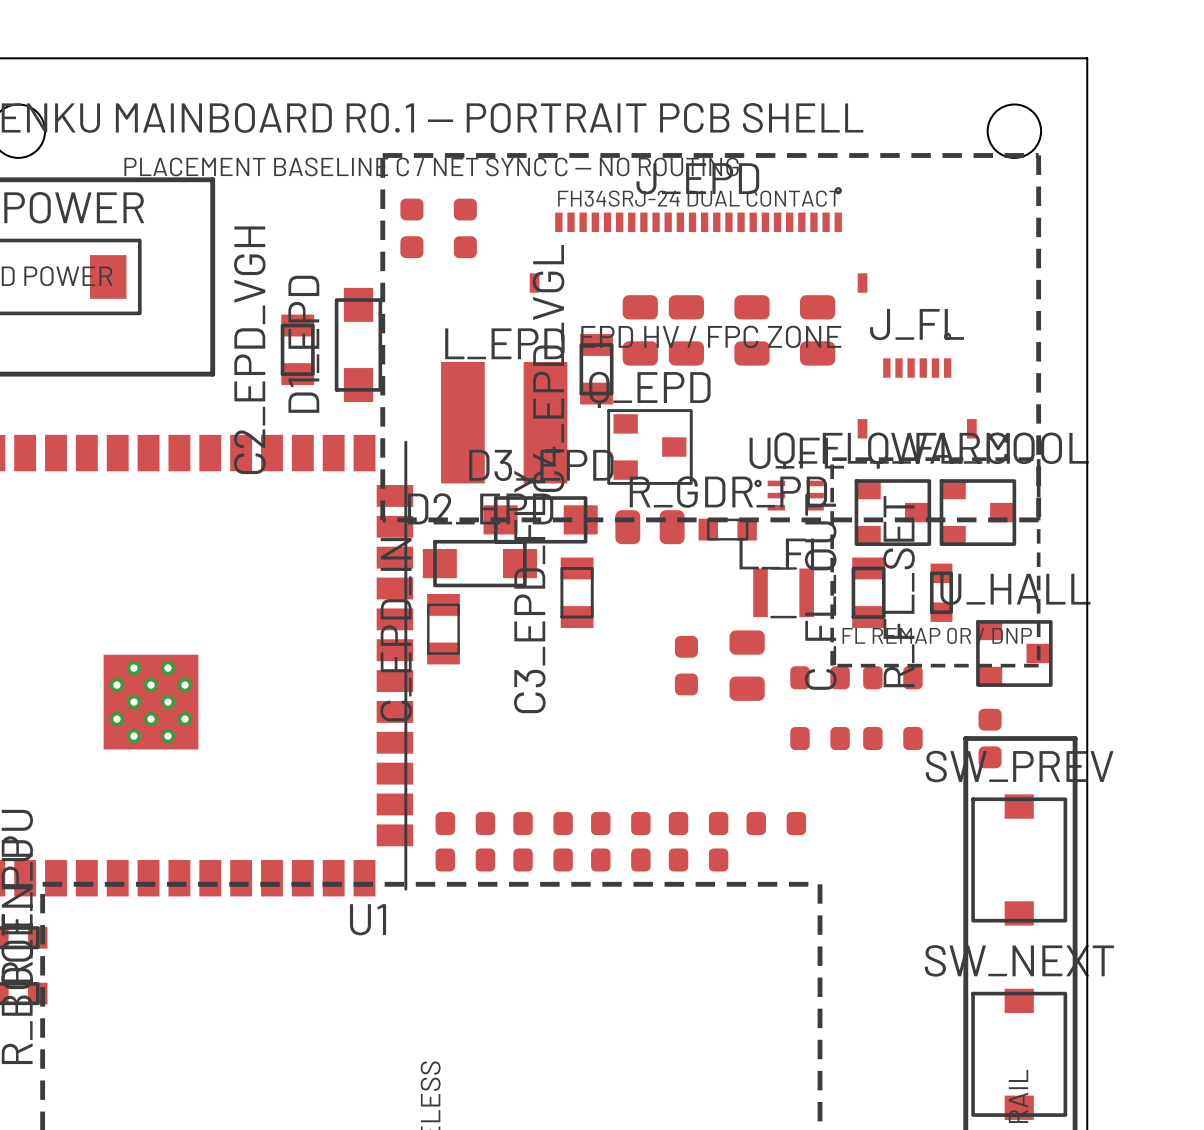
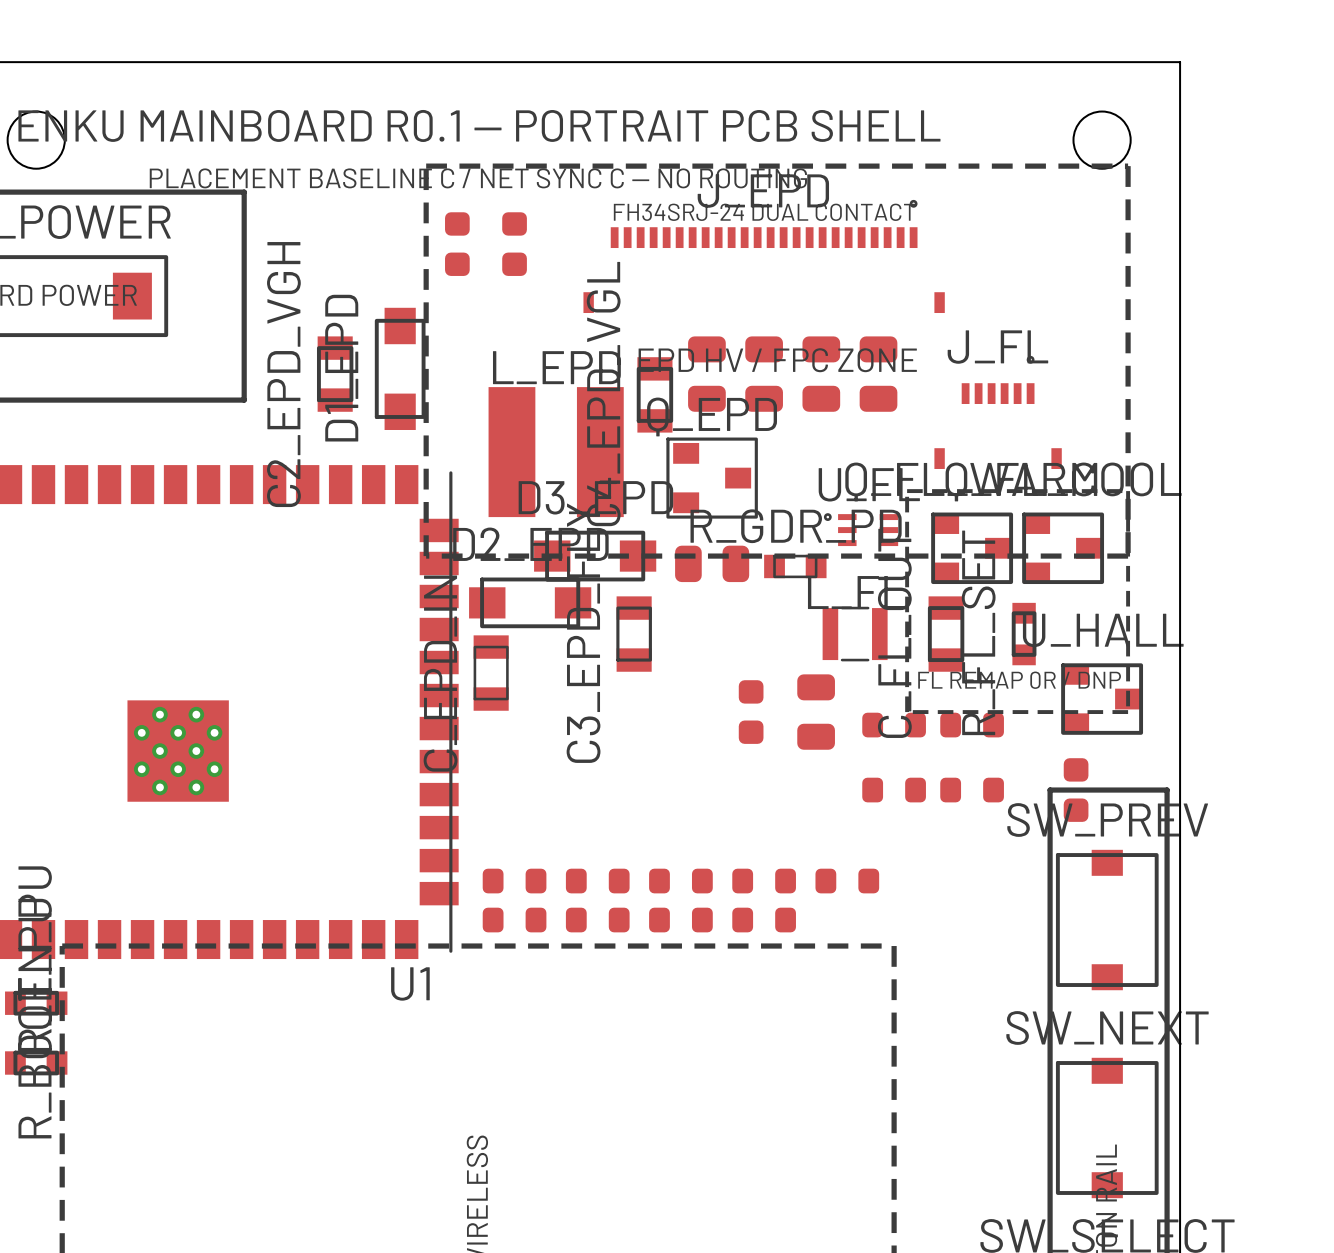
part position: (640, 330) -> (706, 374)
part position: (686, 330) -> (764, 374)
part position: (752, 330) -> (821, 374)
part position: (817, 330) -> (878, 374)

